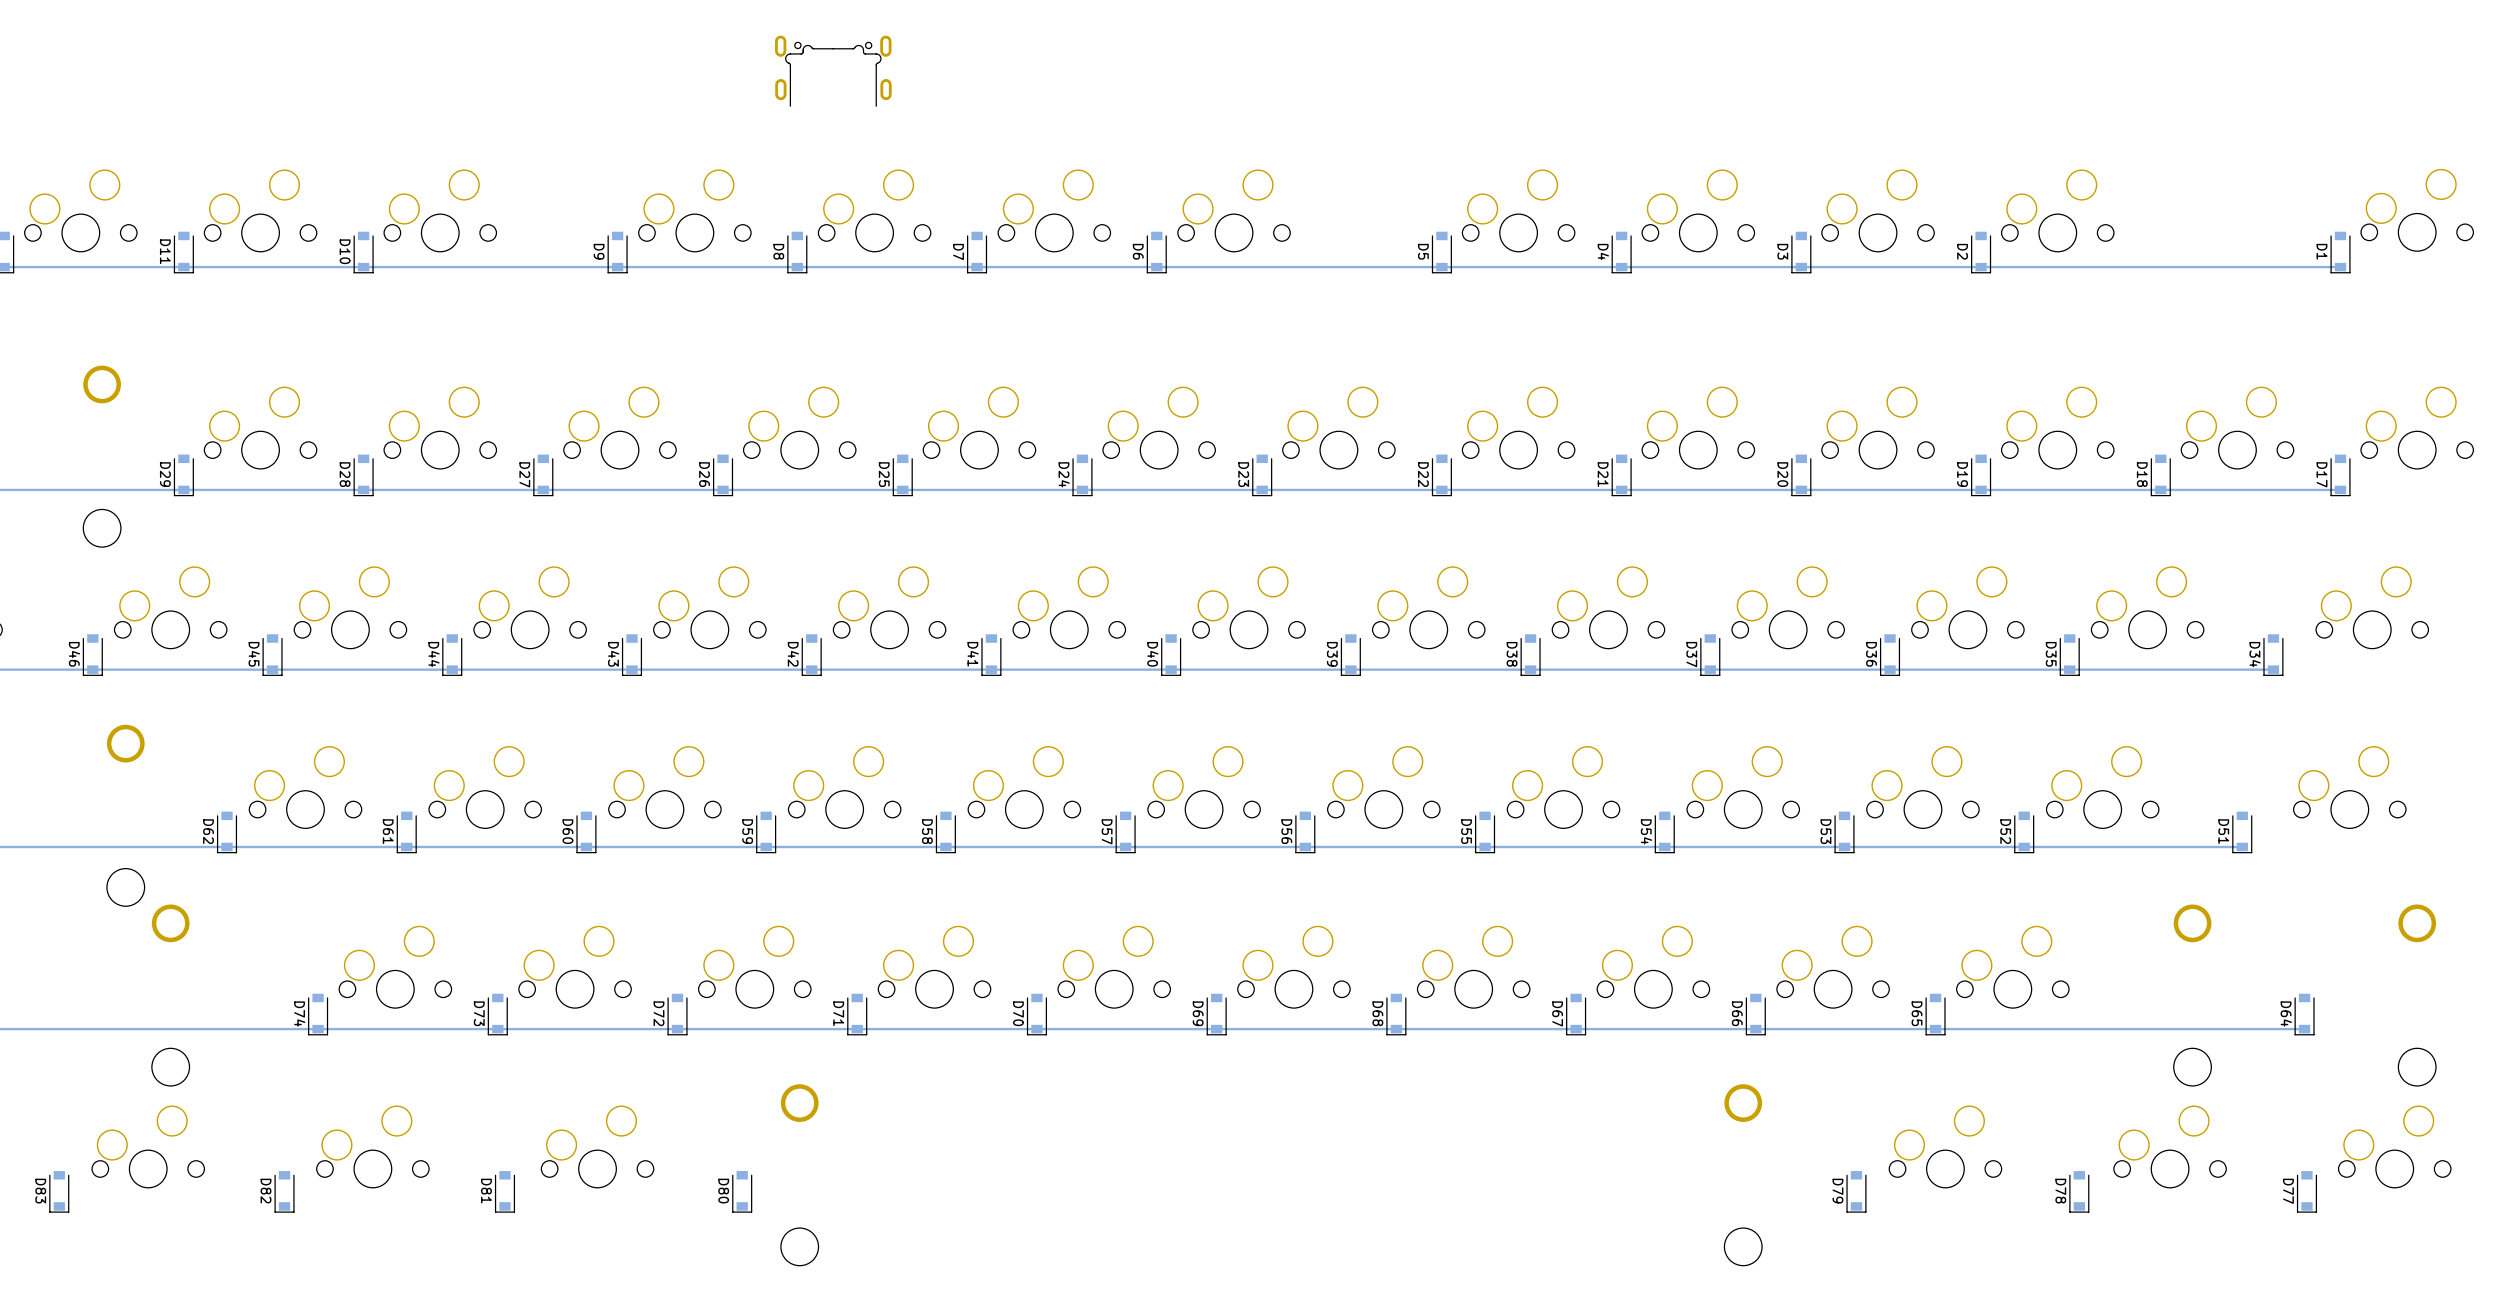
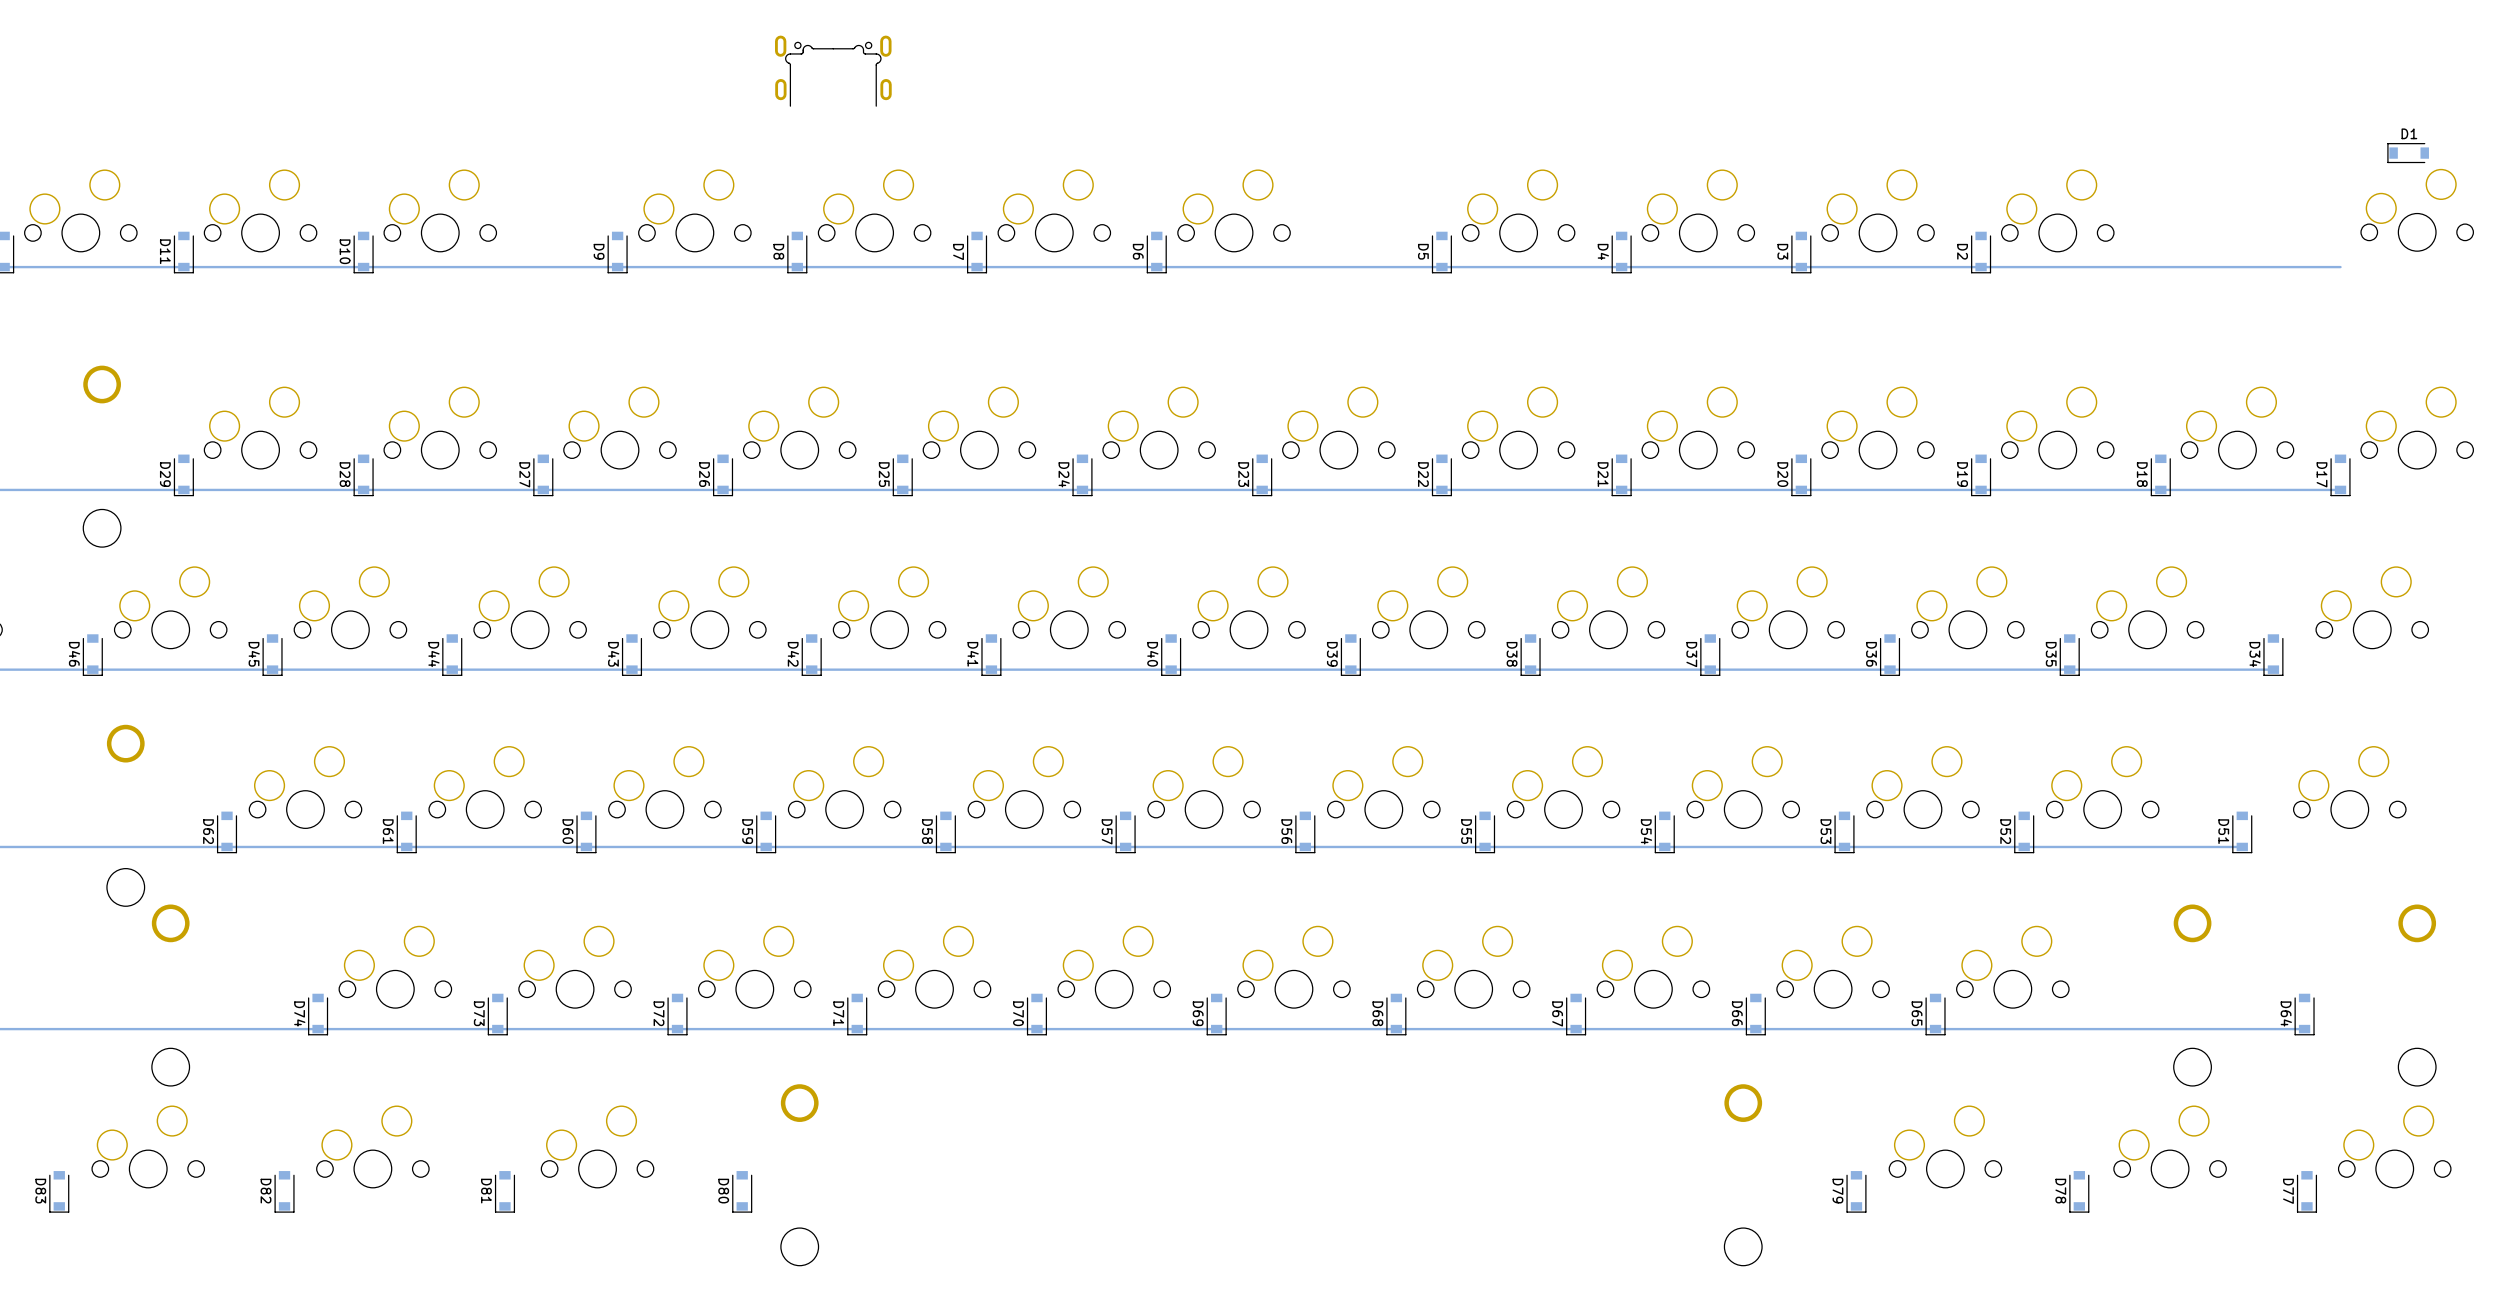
D1 rotation: 0° (2340, 252) -> 90° clockwise (2408, 153)
D1 position: (2340, 252) -> (2408, 153)

